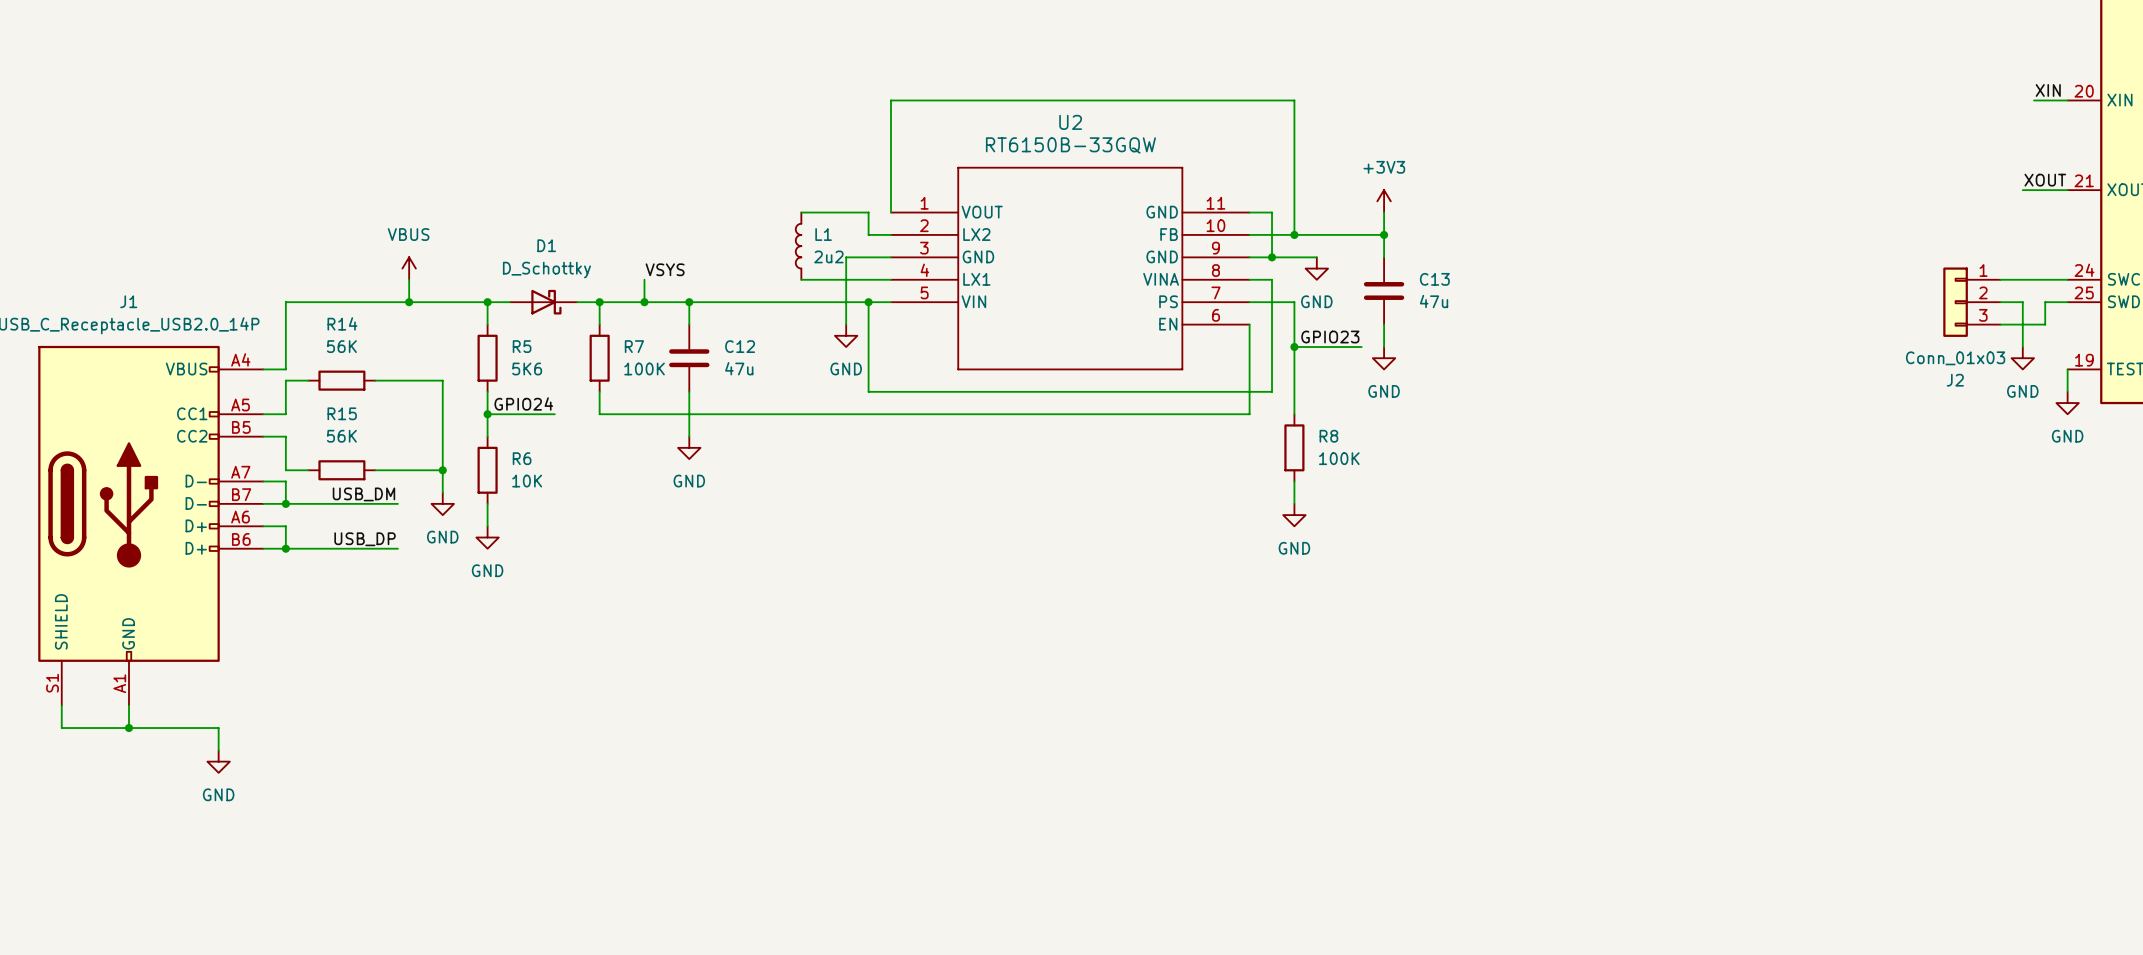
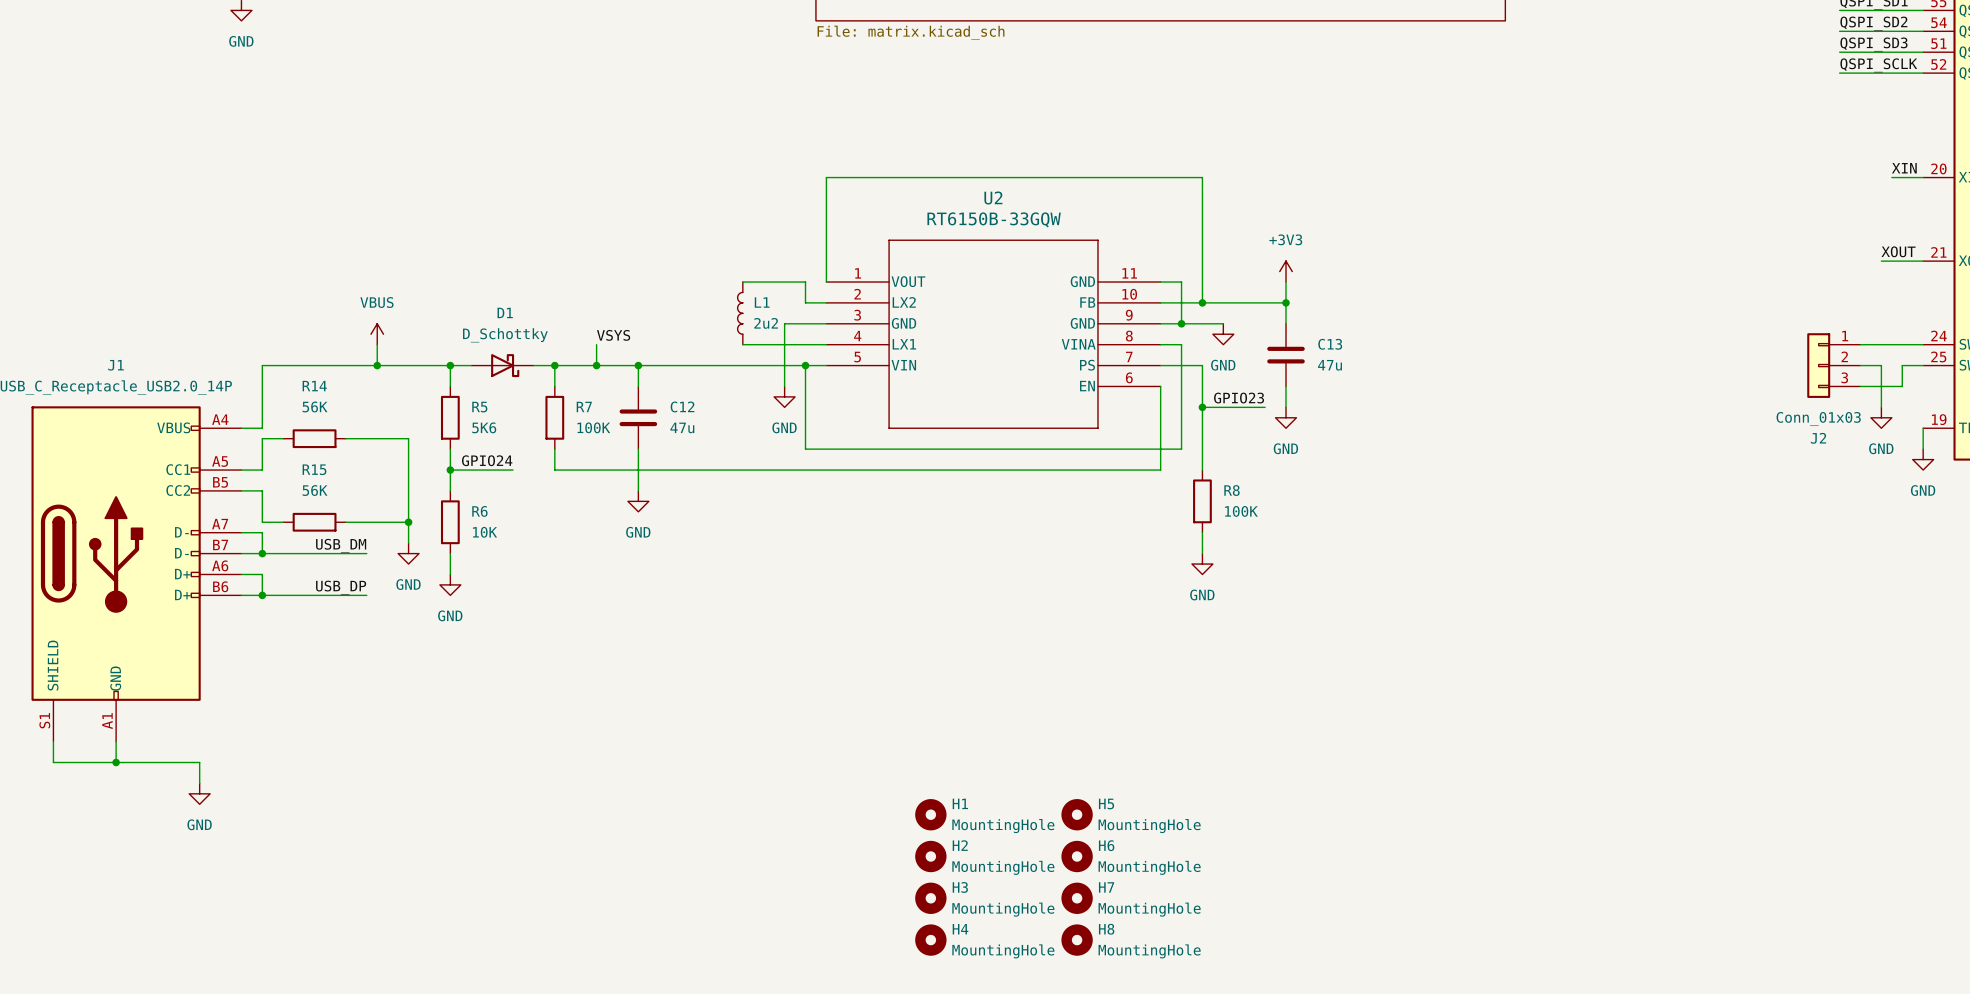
H1: none -> MountingHole (930, 814)
H5: none -> MountingHole (1077, 814)
H2: none -> MountingHole (930, 856)
H6: none -> MountingHole (1077, 856)
H3: none -> MountingHole (930, 898)
H7: none -> MountingHole (1077, 898)
H4: none -> MountingHole (930, 940)
H8: none -> MountingHole (1077, 940)

